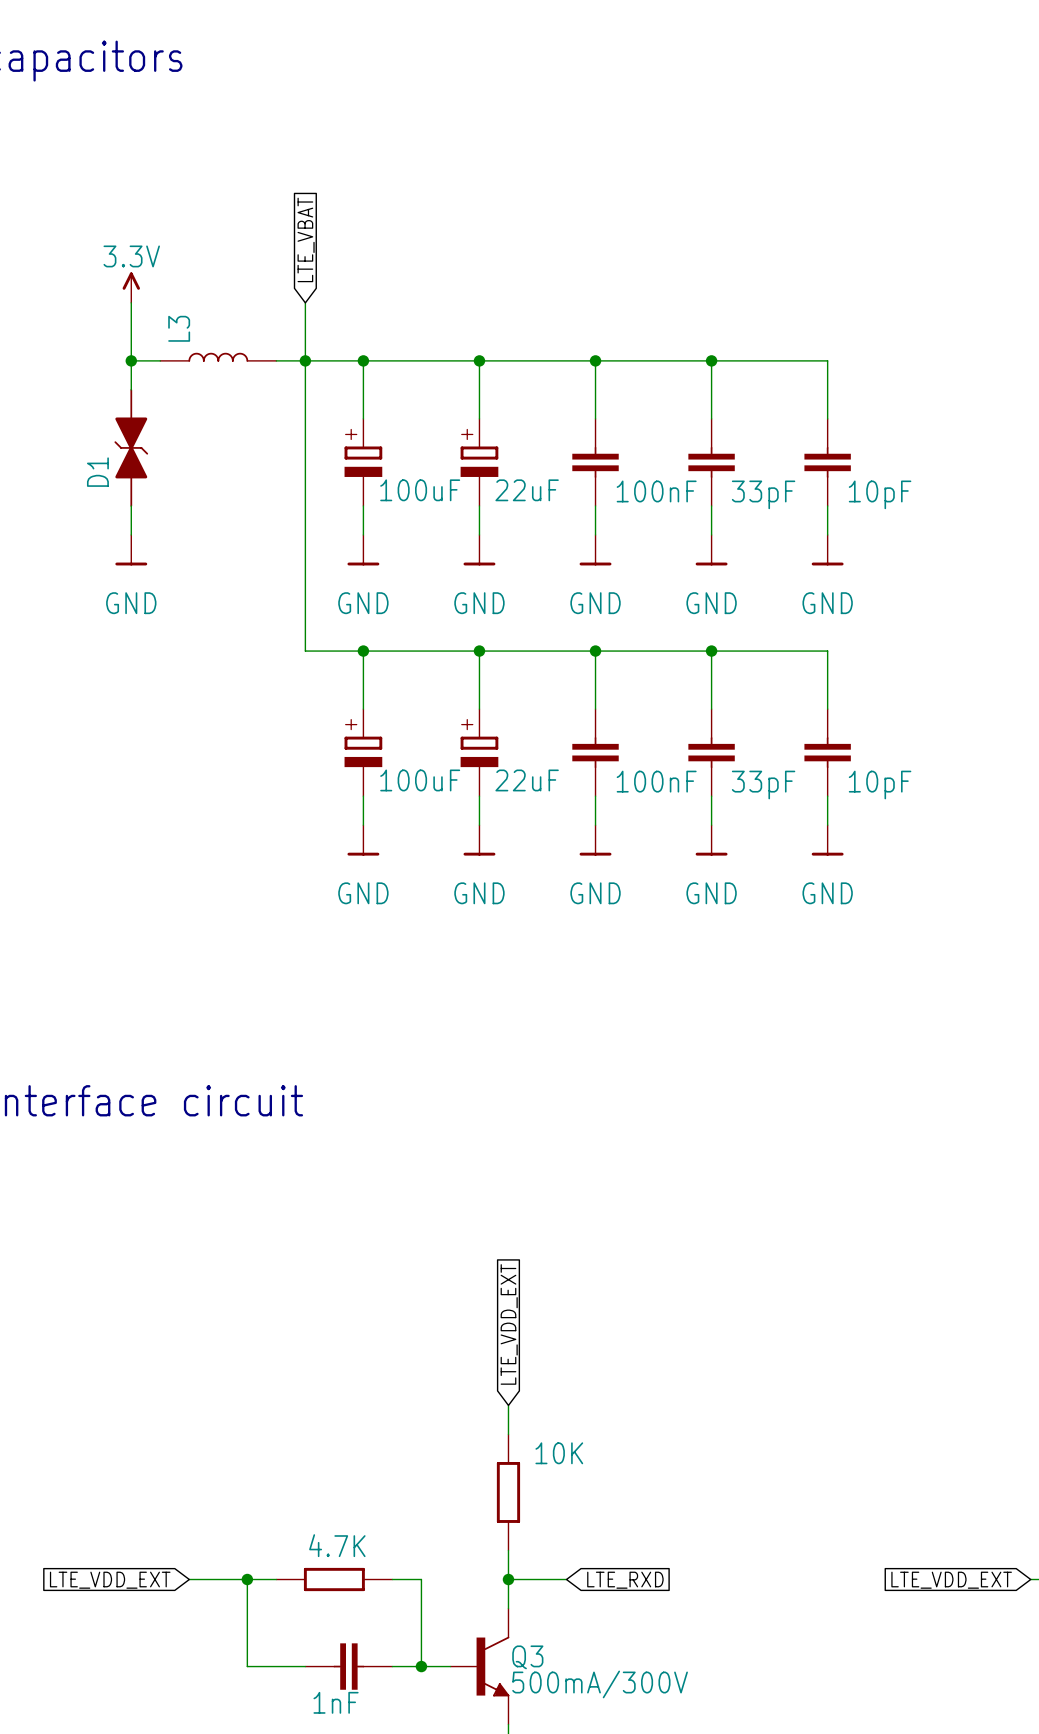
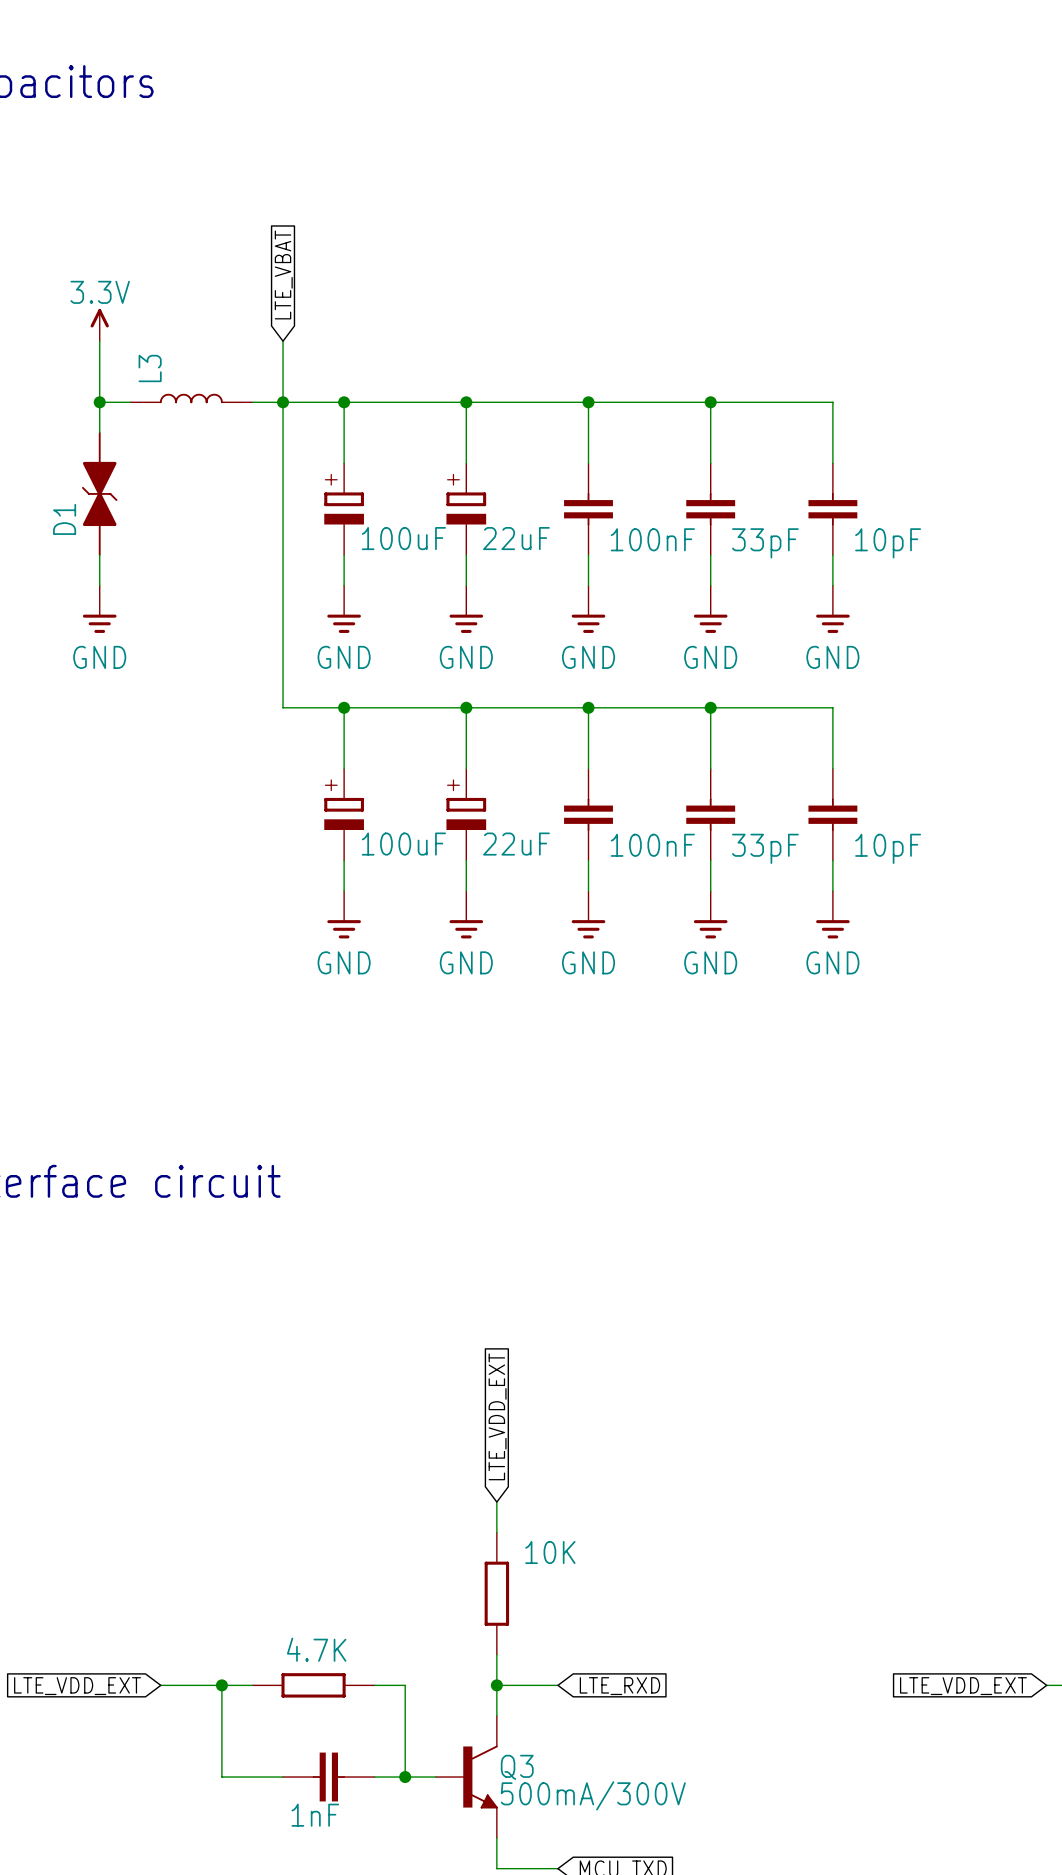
power symbol shape: [115, 534, 148, 566] -> [82, 585, 117, 633]
power symbol shape: [347, 534, 380, 566] -> [327, 585, 361, 633]
power symbol shape: [463, 534, 496, 566] -> [449, 585, 484, 633]
power symbol shape: [579, 534, 612, 566] -> [571, 585, 606, 633]
power symbol shape: [695, 534, 728, 566] -> [693, 585, 728, 633]
power symbol shape: [811, 534, 844, 566] -> [816, 585, 850, 633]
power symbol shape: [347, 825, 380, 856] -> [327, 891, 361, 939]
power symbol shape: [463, 825, 496, 856] -> [449, 891, 484, 939]
power symbol shape: [579, 825, 612, 856] -> [571, 891, 606, 939]
power symbol shape: [695, 825, 728, 856] -> [693, 891, 728, 939]
power symbol shape: [811, 825, 844, 856] -> [816, 891, 850, 939]

